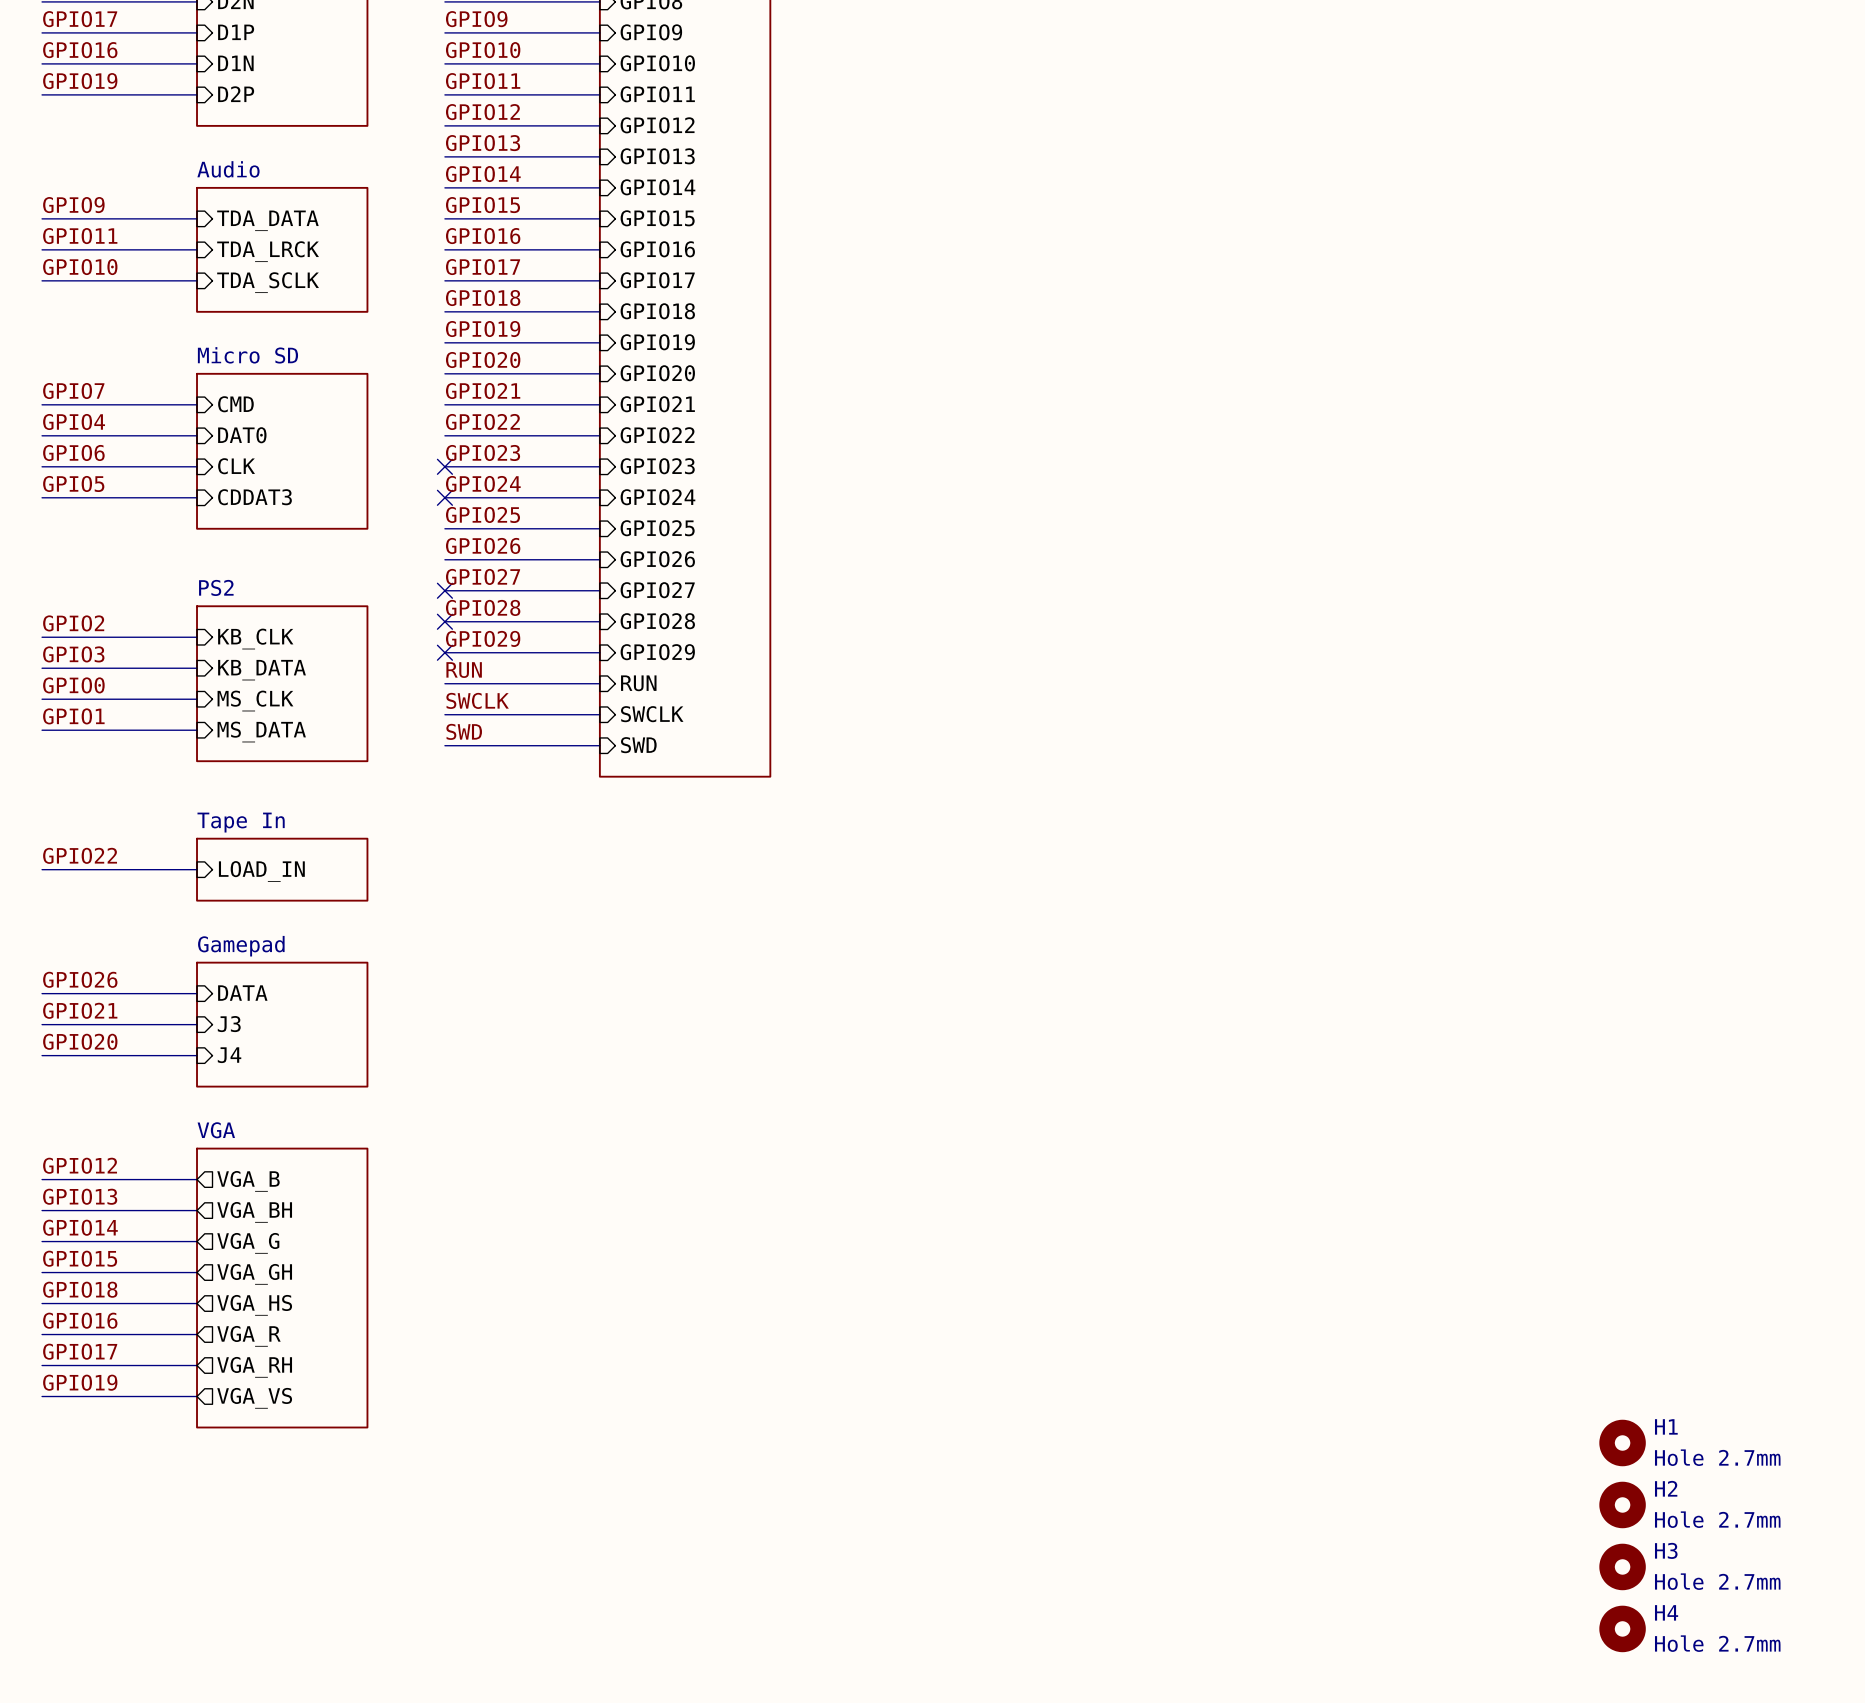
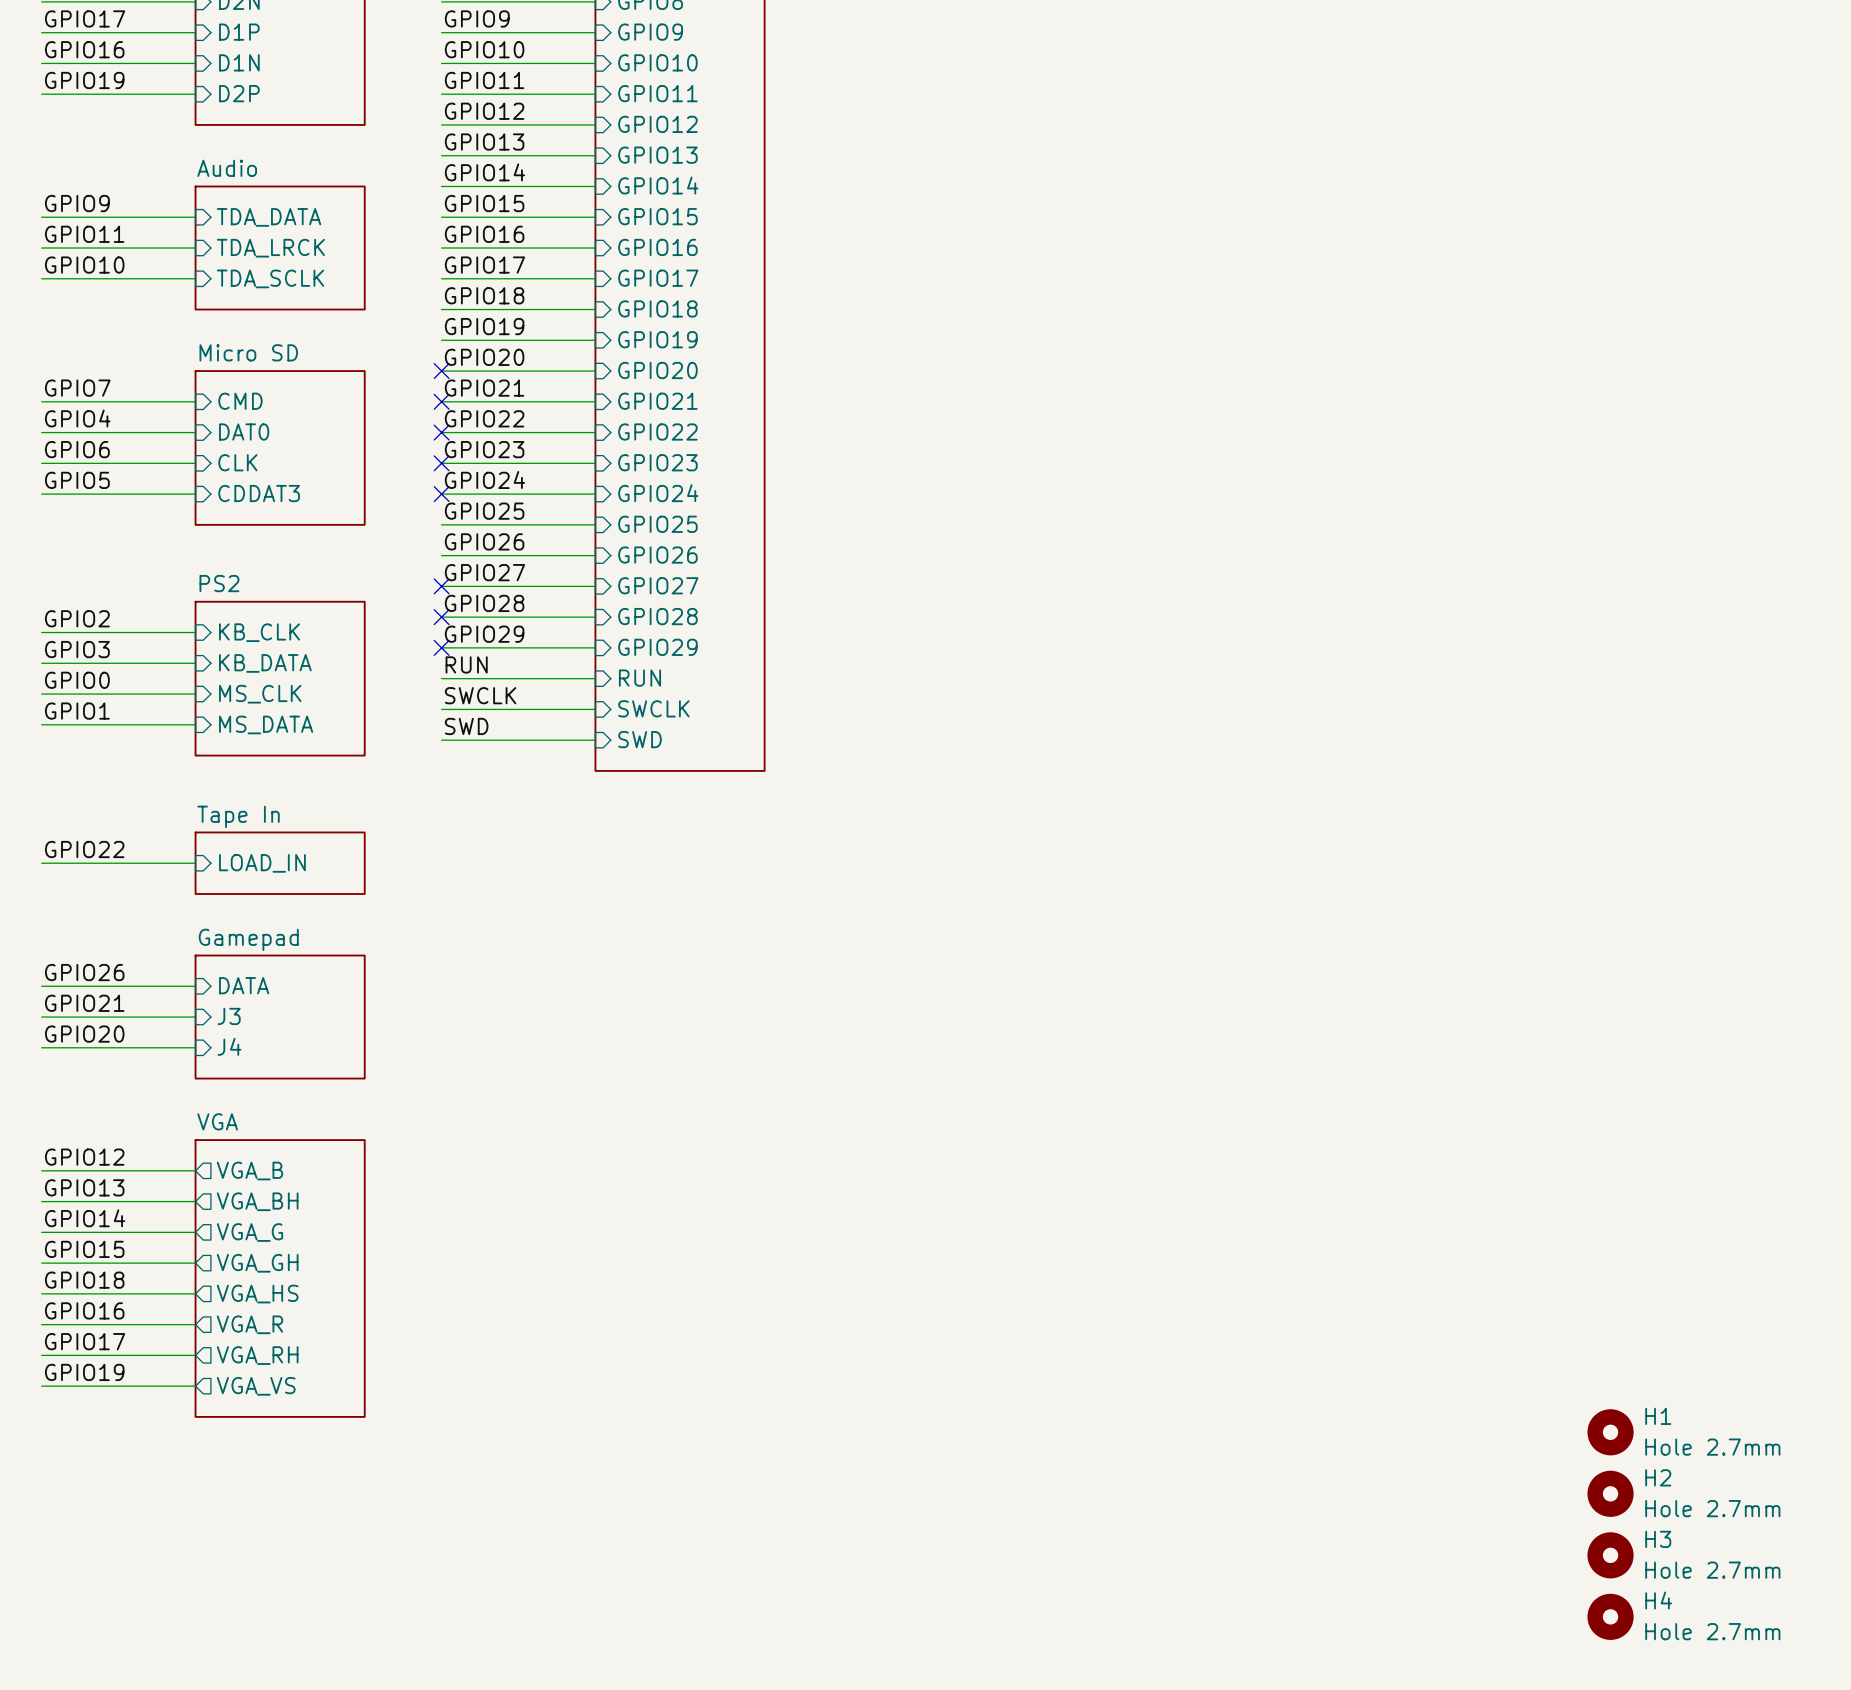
no-connect mark: none -> (441, 371)
no-connect mark: none -> (441, 401)
no-connect mark: none -> (441, 432)

